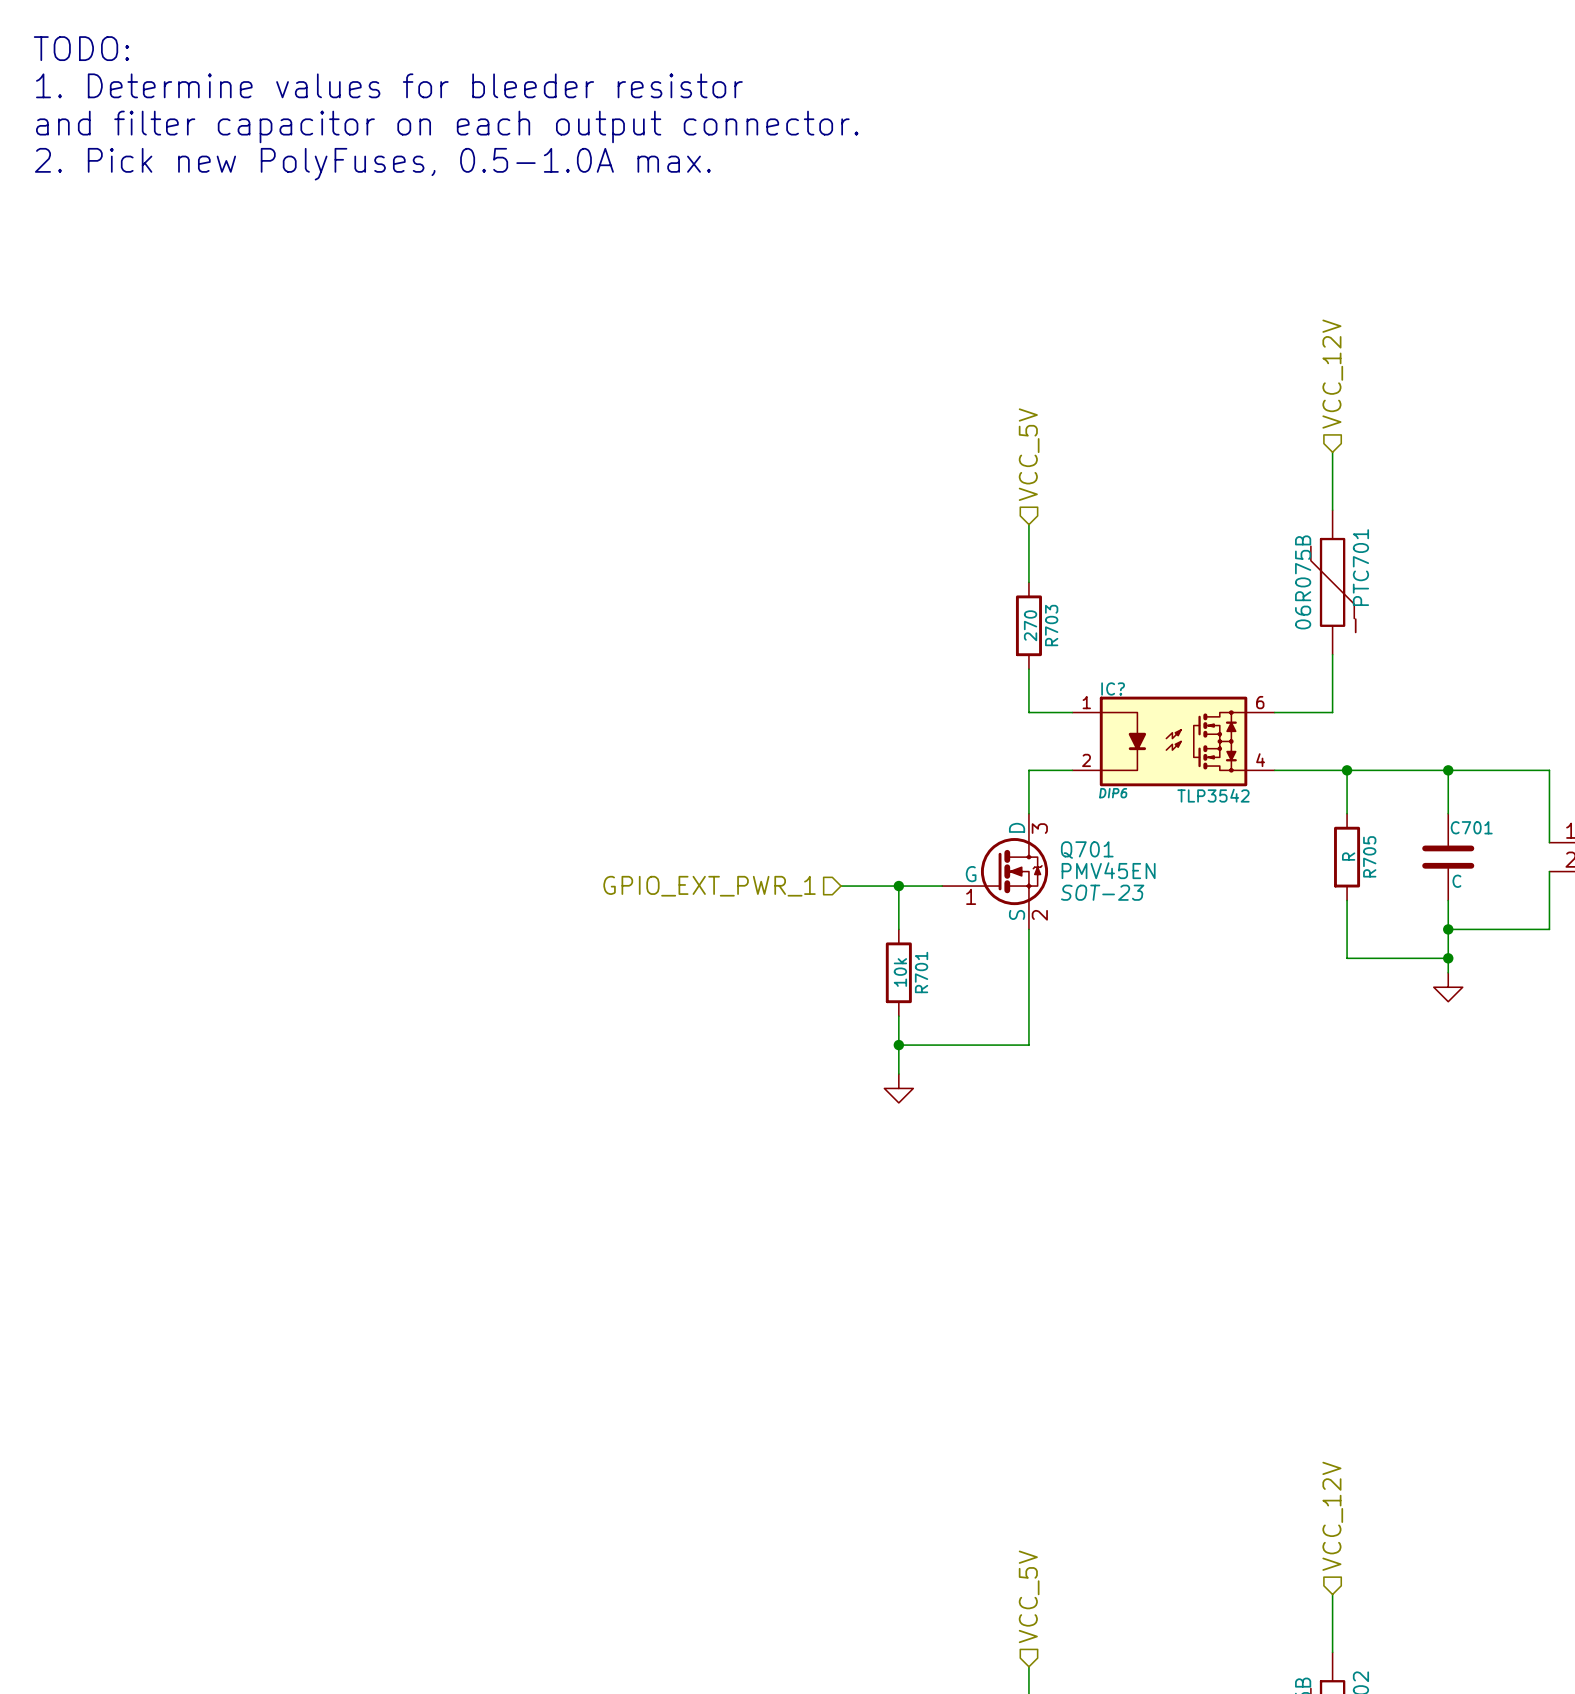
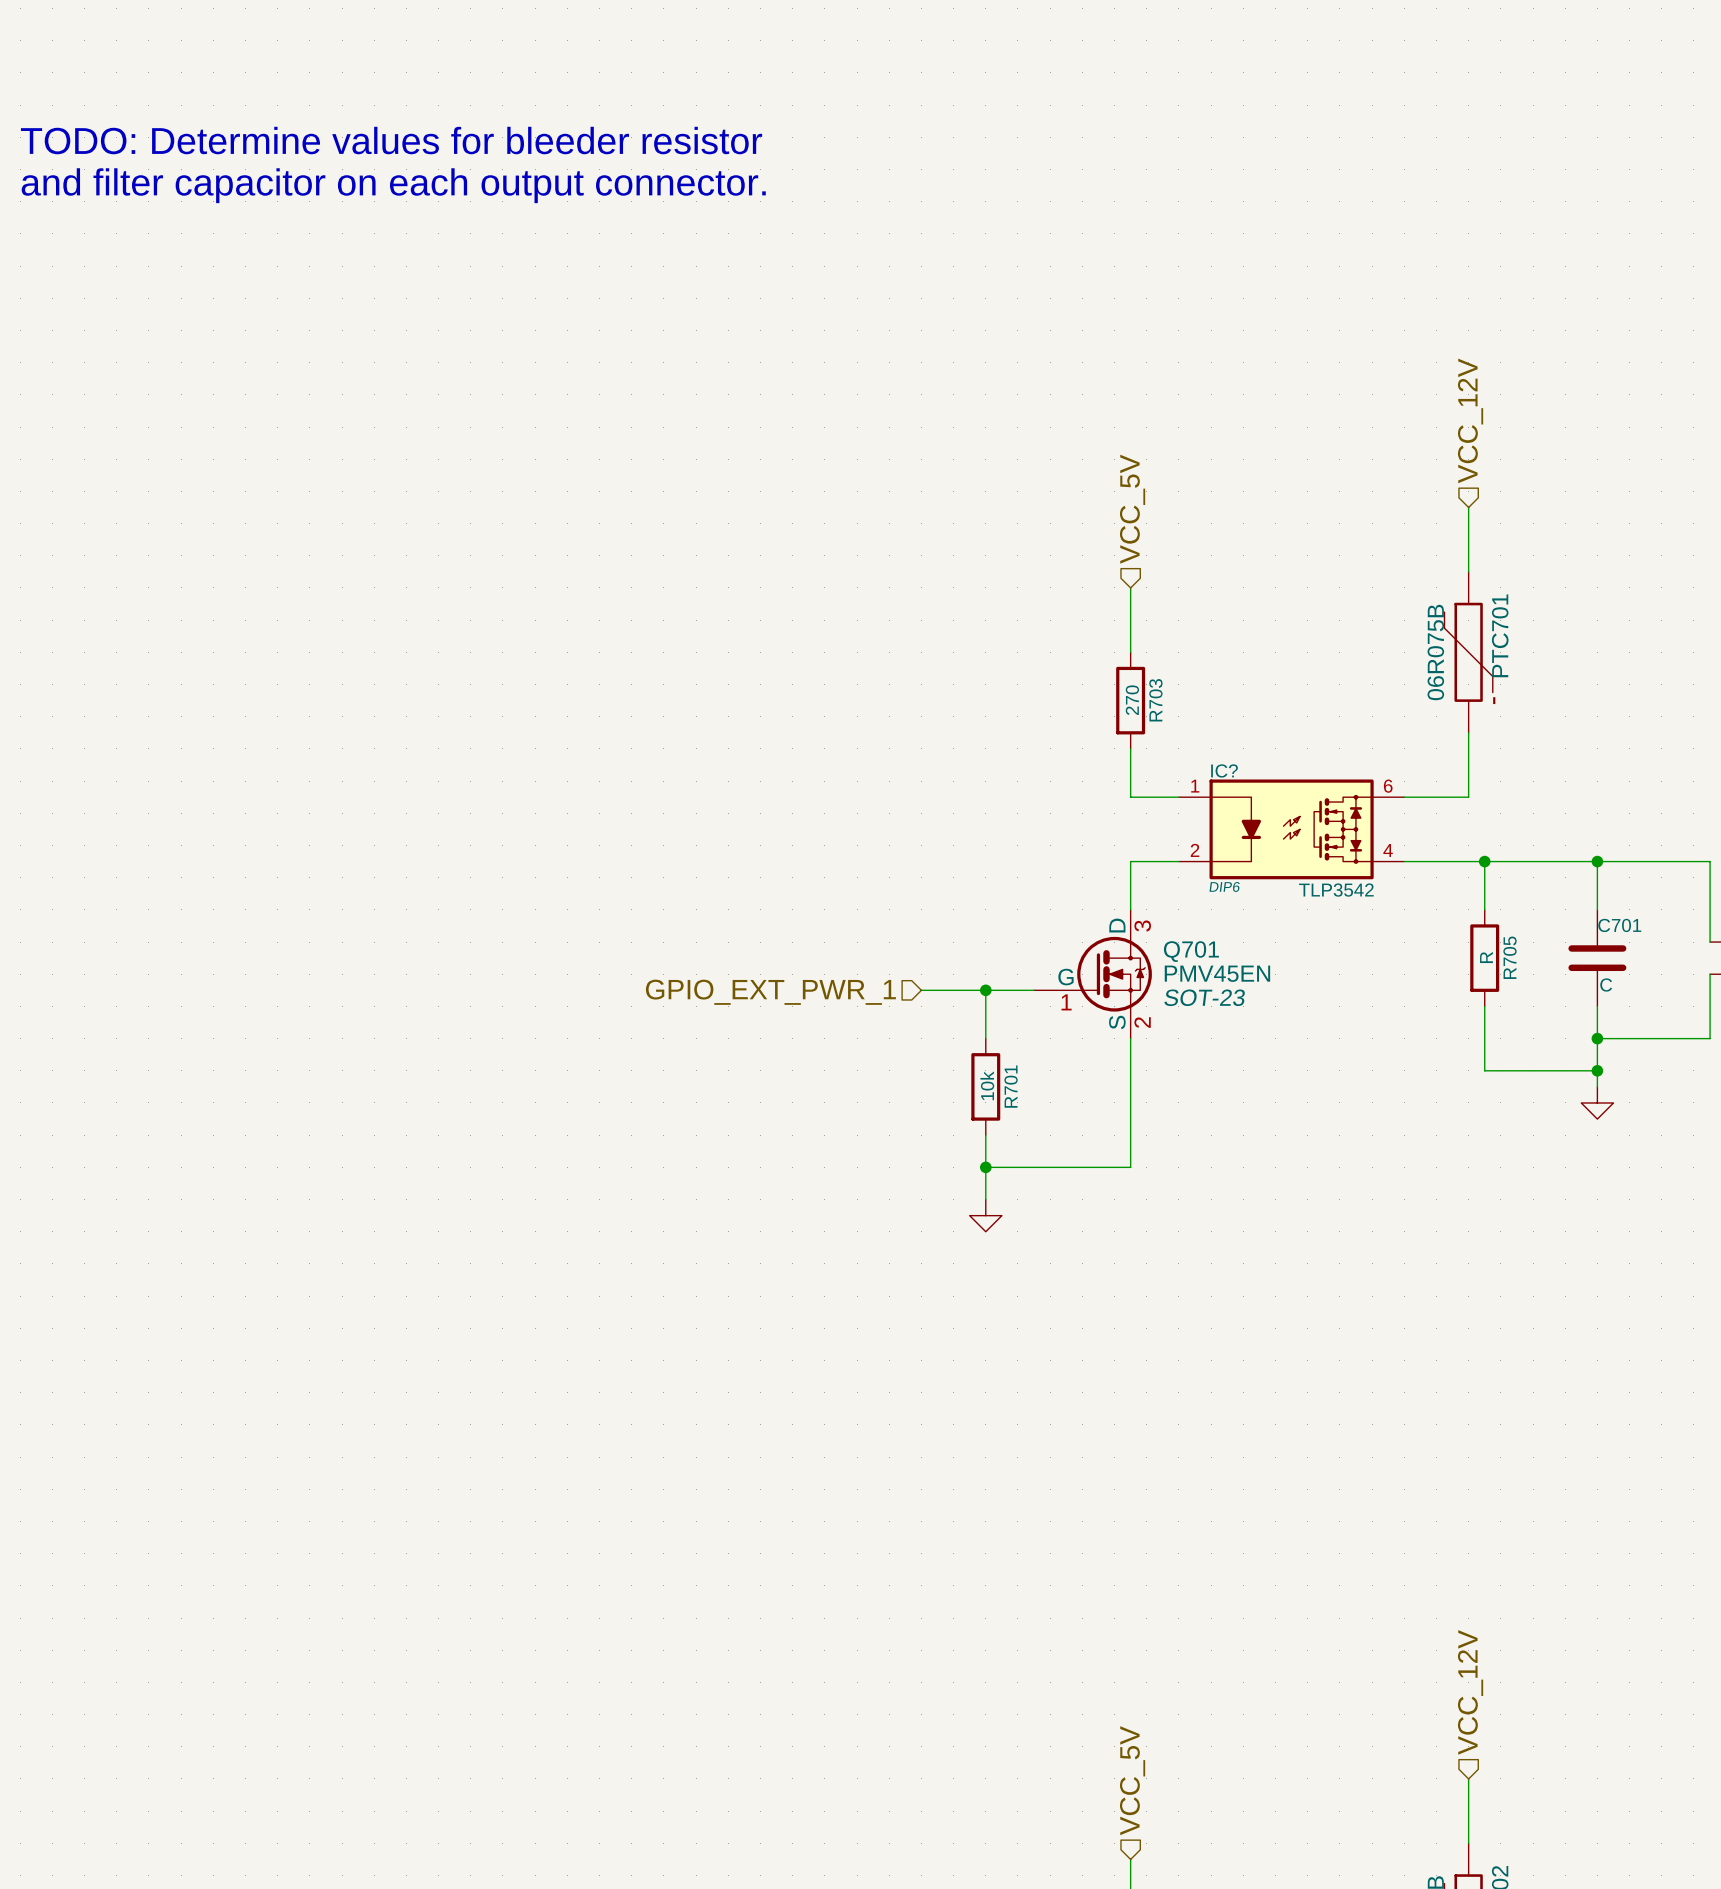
text: TODO: (81, 48) -> none
text: 1. Determine values for bleeder resistor (389, 85) -> none
text: and filter capacitor on each output connector. (447, 126) -> TODO: Determine values for bleeder resistor (391, 140)
text: 2. Pick new PolyFuses, 0.5-1.0A max. (372, 164) -> and filter capacitor on each output connector. (393, 185)

